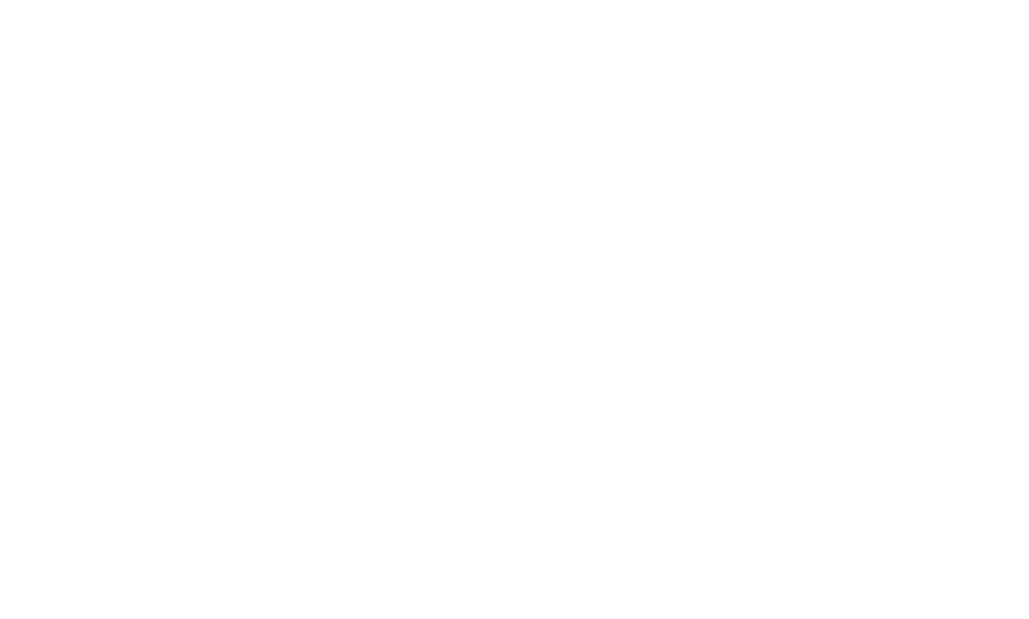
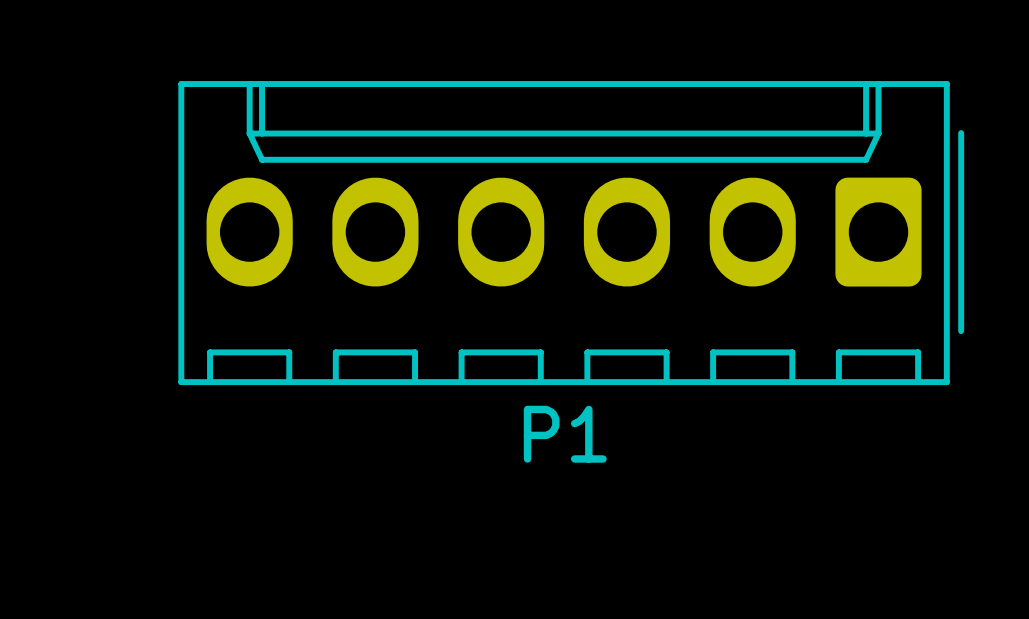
P1: none -> (571, 233)

